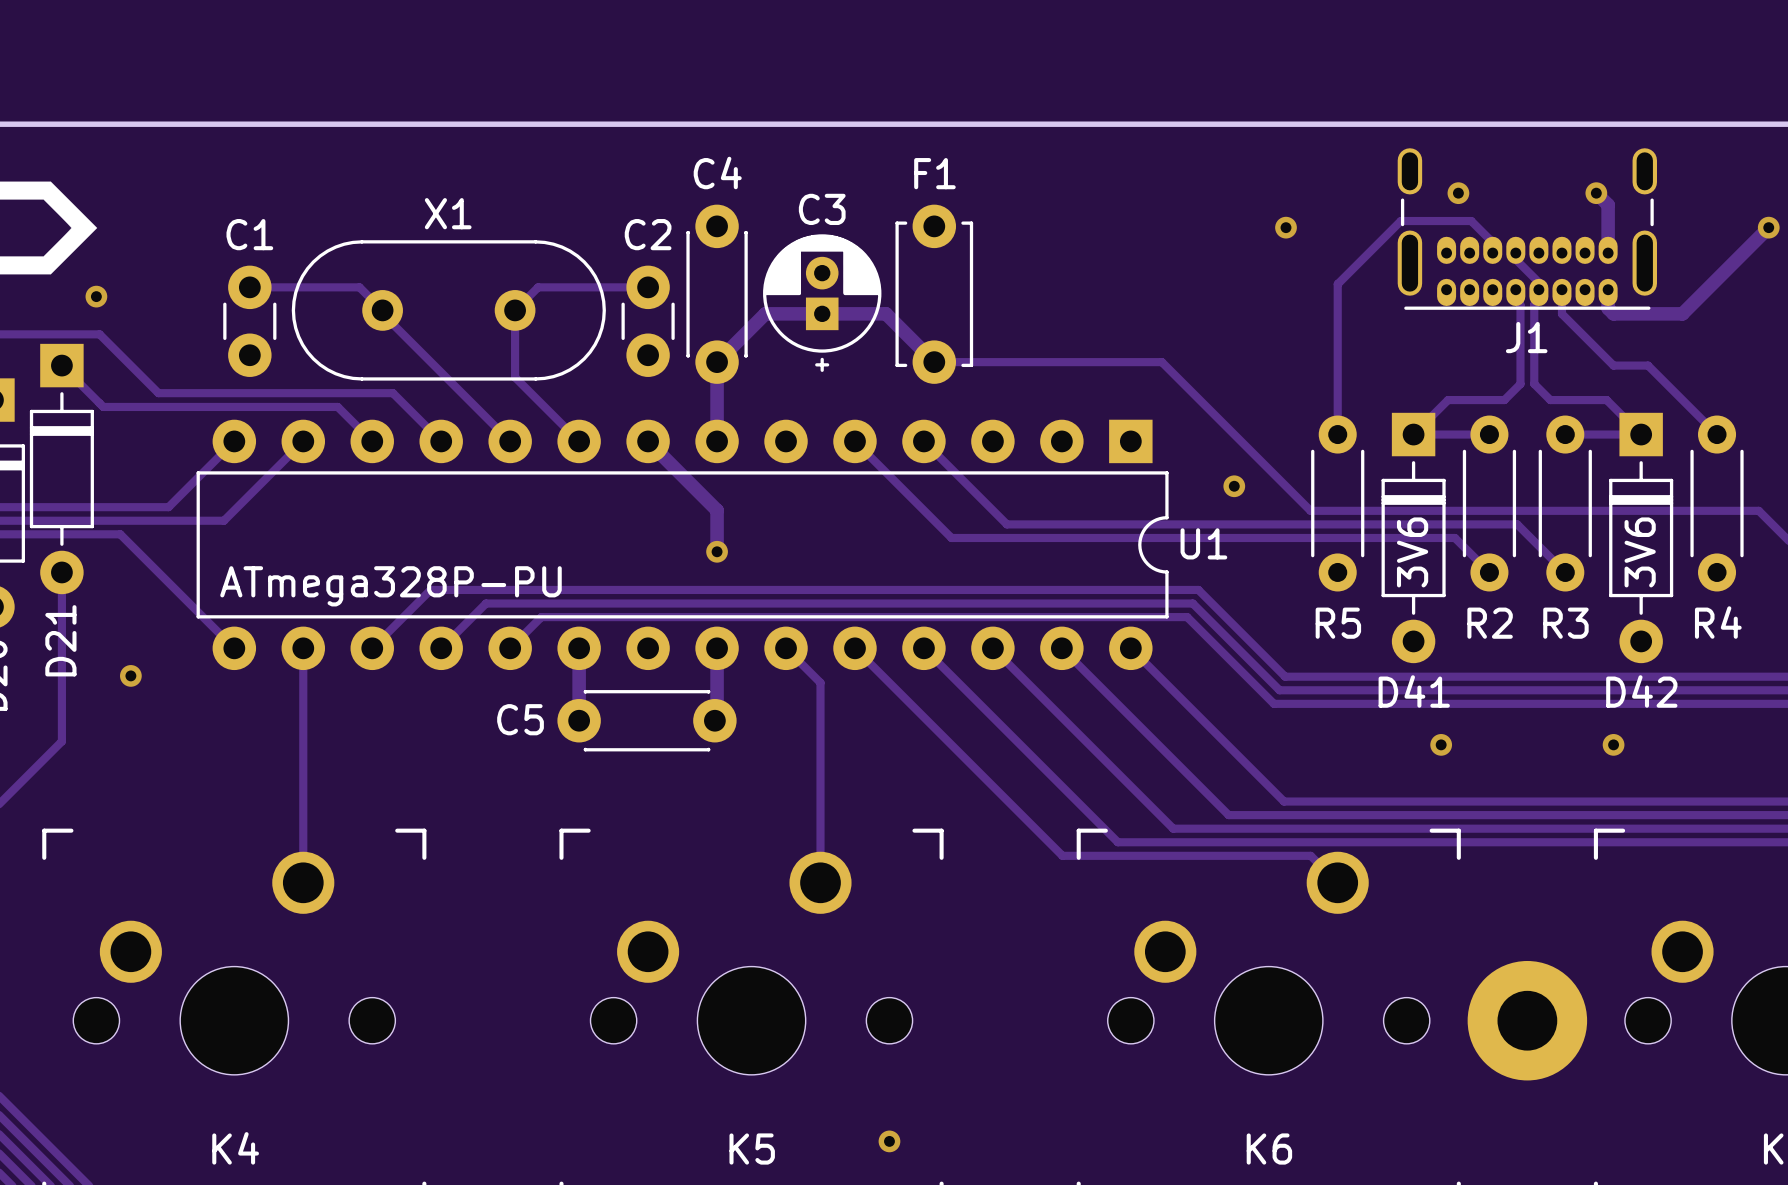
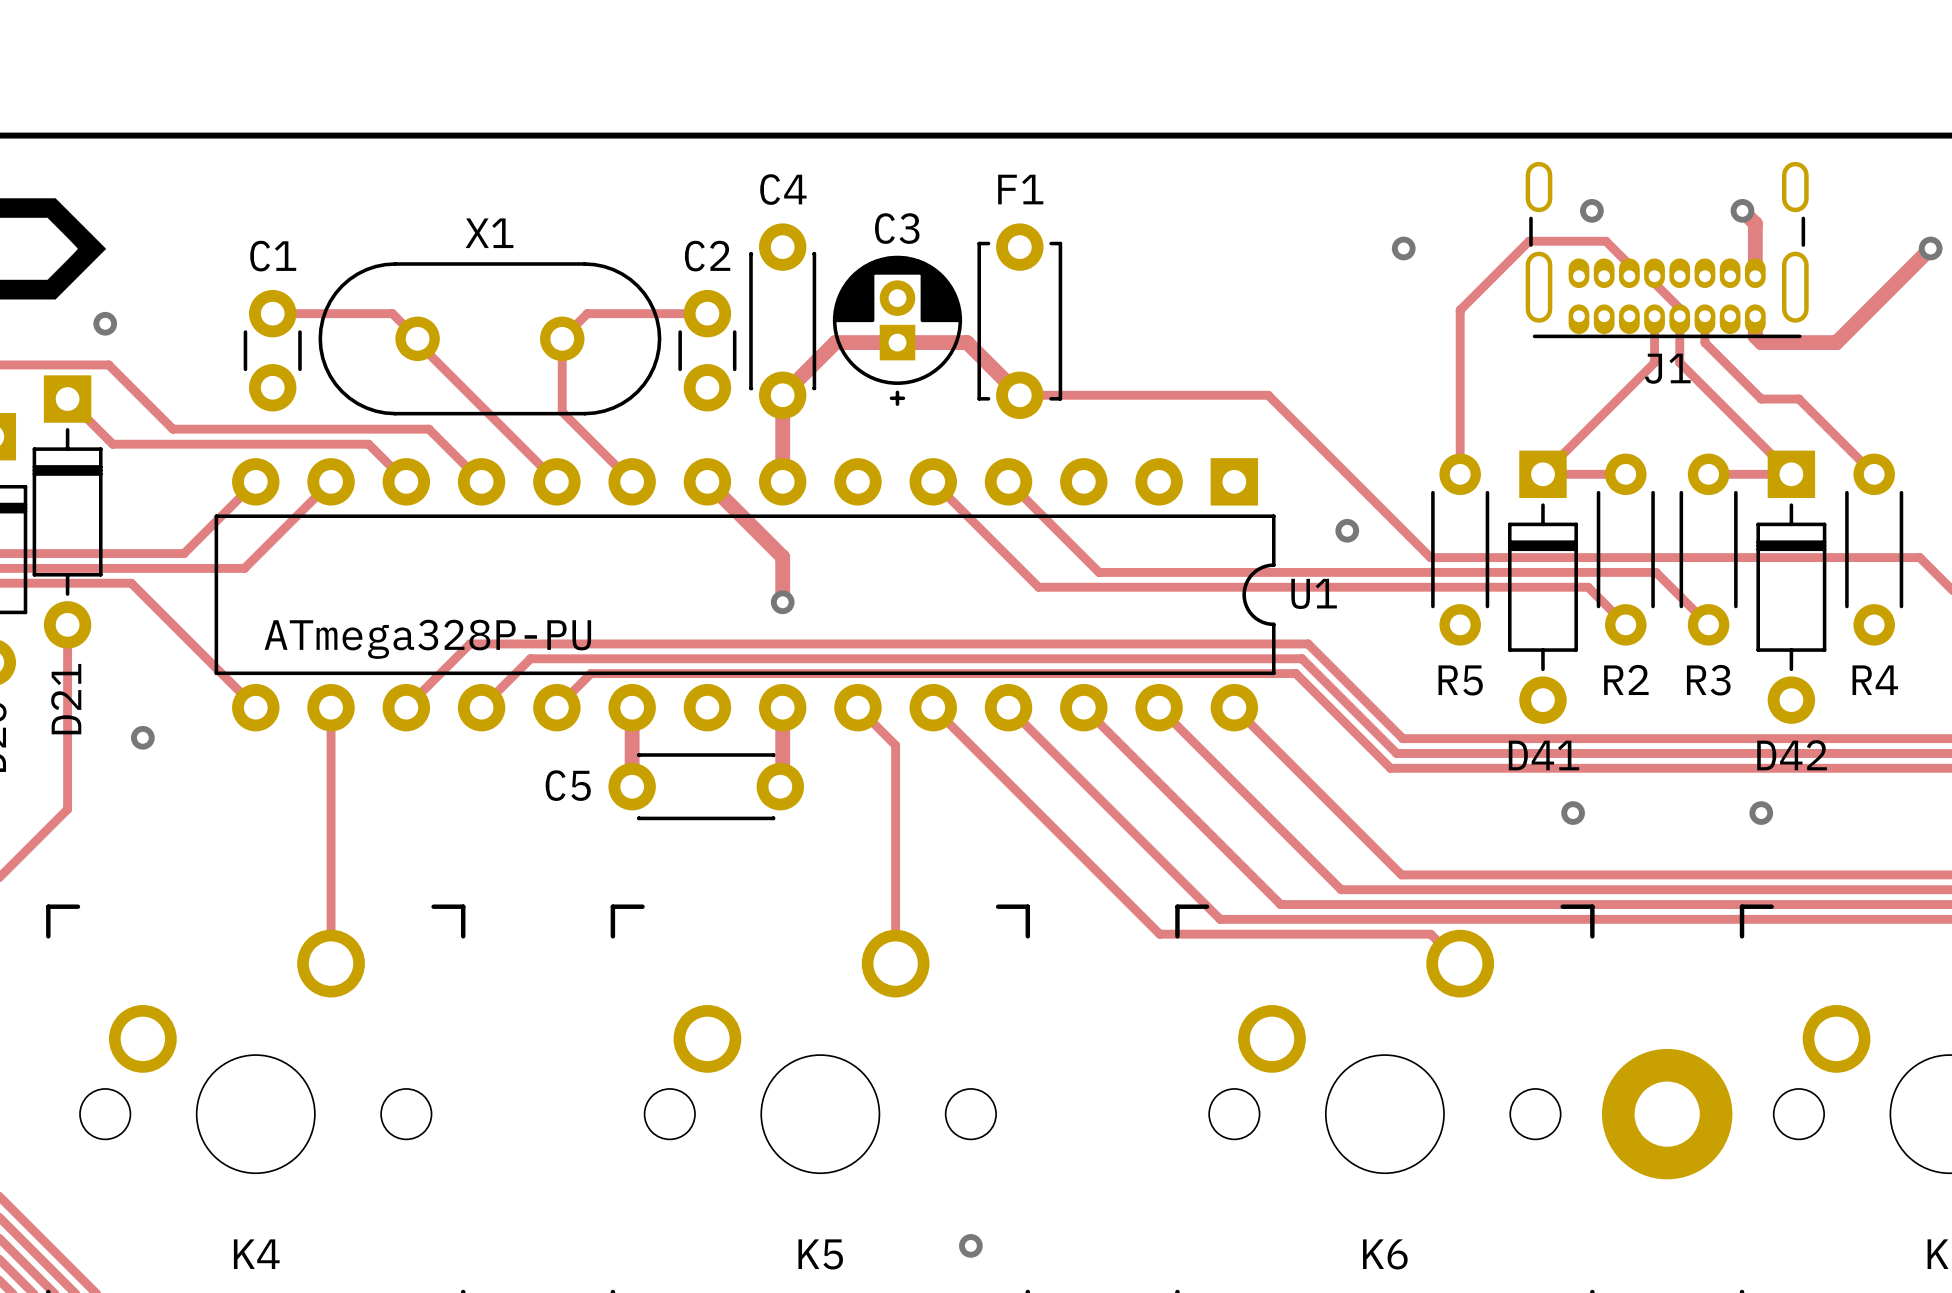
track: (1515, 289) (1519, 293) (1520, 304) (1520, 384) (1504, 400) (1448, 400) -> (1654, 316) (1654, 362) (1580, 436)
track: (1538, 289) (1534, 293) (1534, 304) (1534, 383) (1550, 400) (1606, 400) -> (1679, 316) (1679, 362) (1753, 436)
text: 3V6 (1412, 552) -> none
text: 3V6 (1640, 552) -> none

